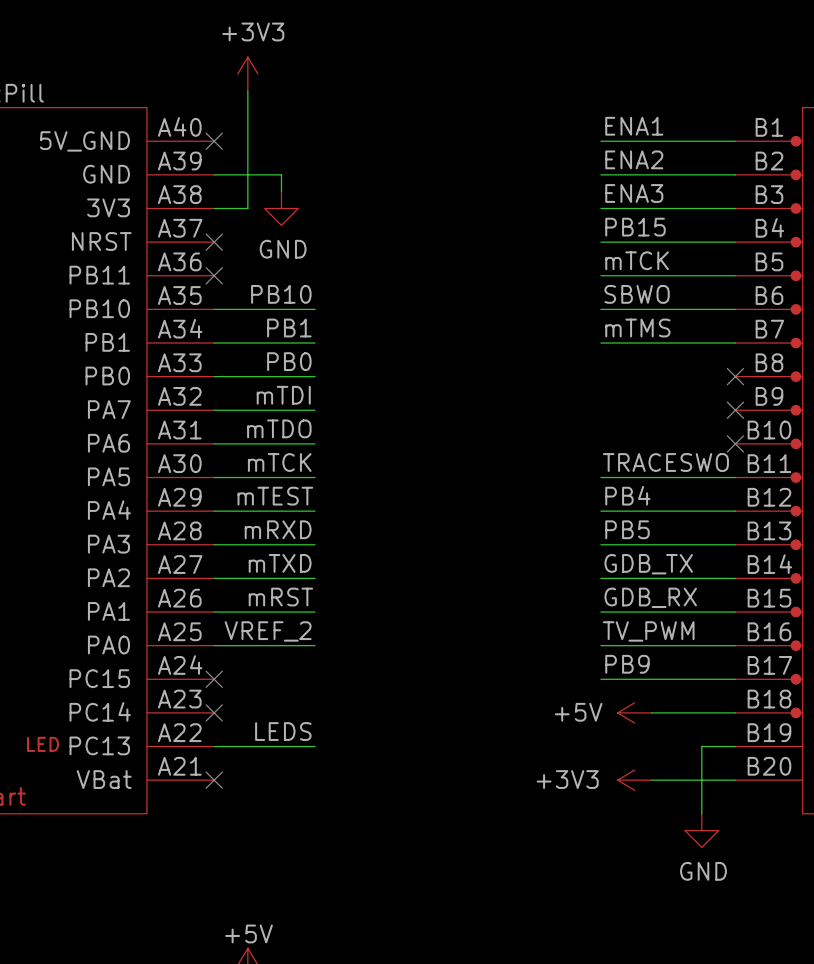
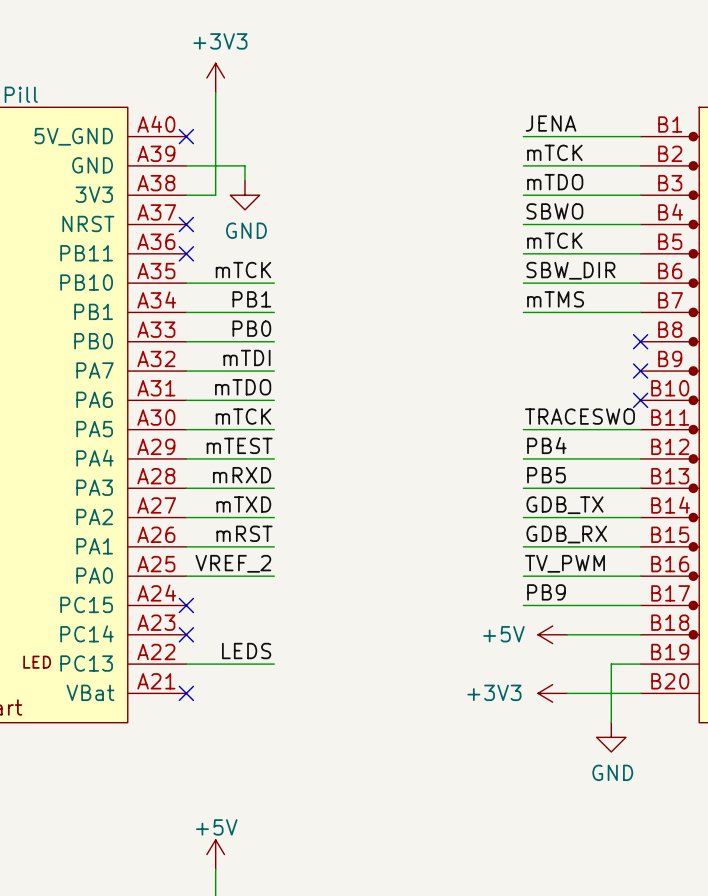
label: ENA1 (634, 126) -> JENA (551, 123)
label: ENA2 (634, 159) -> mTCK (554, 152)
label: ENA3 (634, 193) -> mTDO (555, 182)
label: PB15 (635, 227) -> SBWO (554, 211)
label: PB10 (281, 294) -> mTCK (243, 270)
label: SBWO (637, 294) -> SBW_DIR (570, 270)

